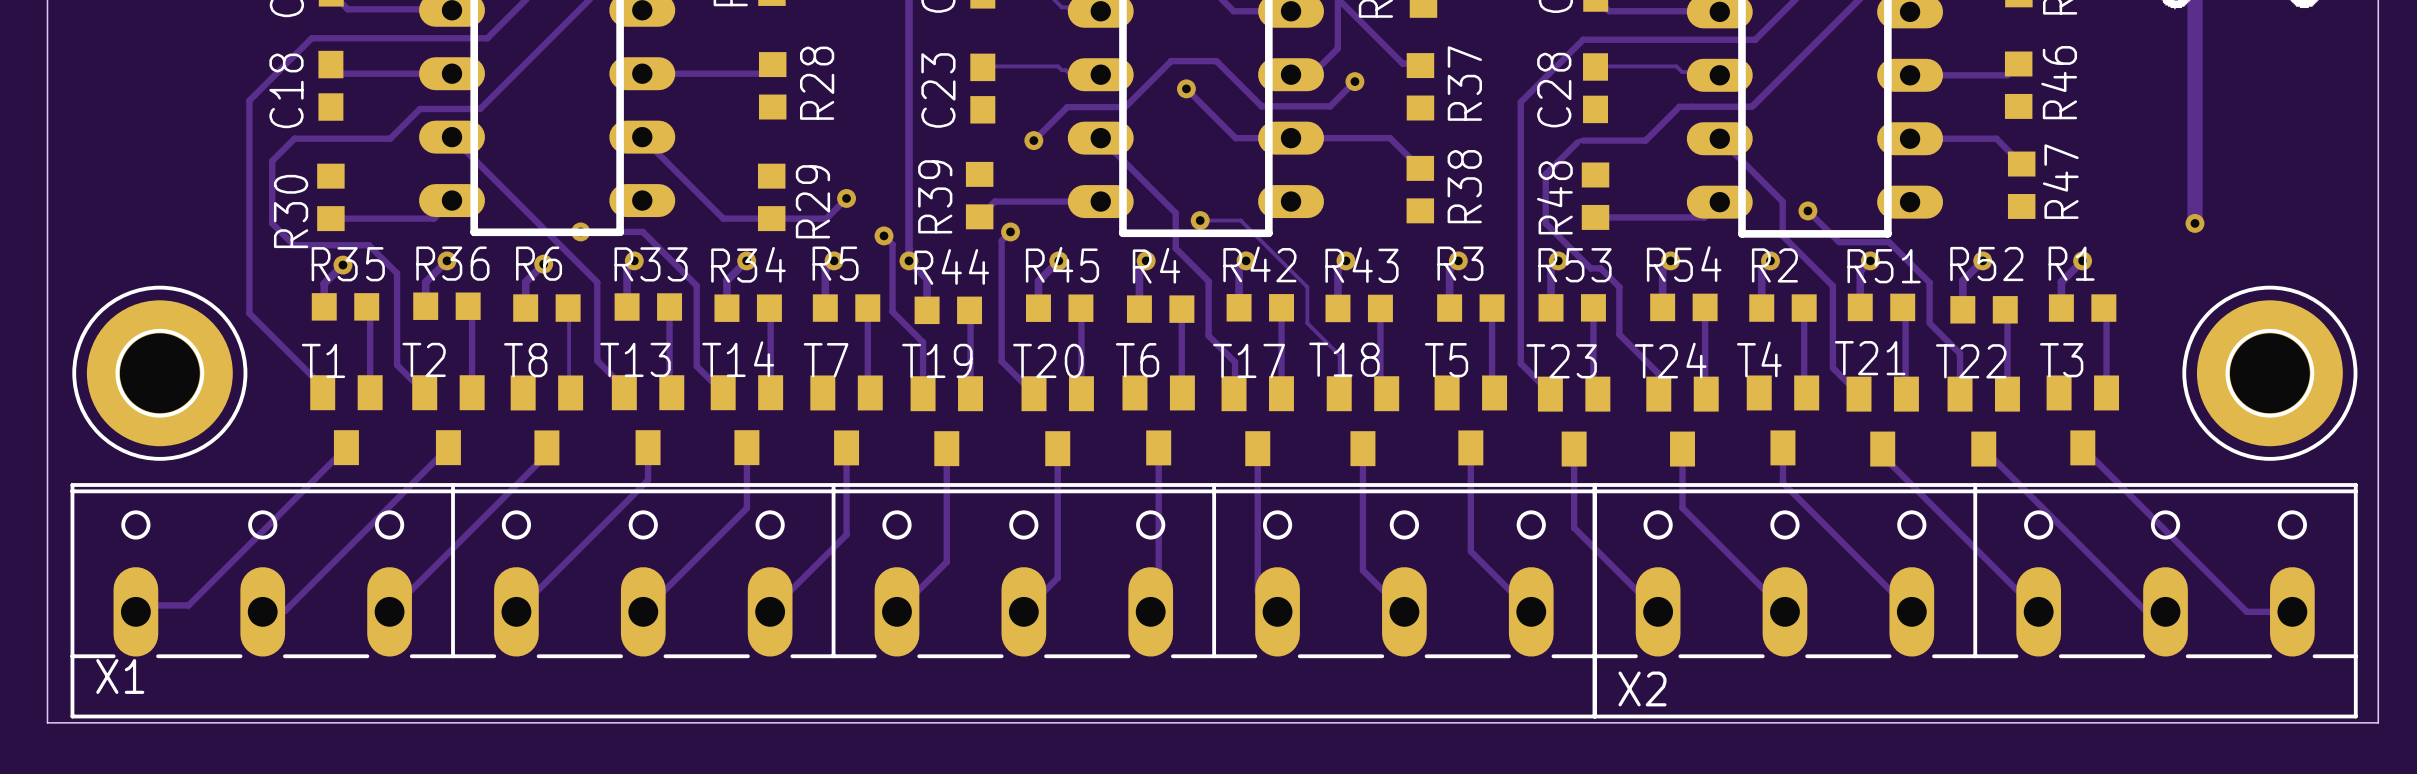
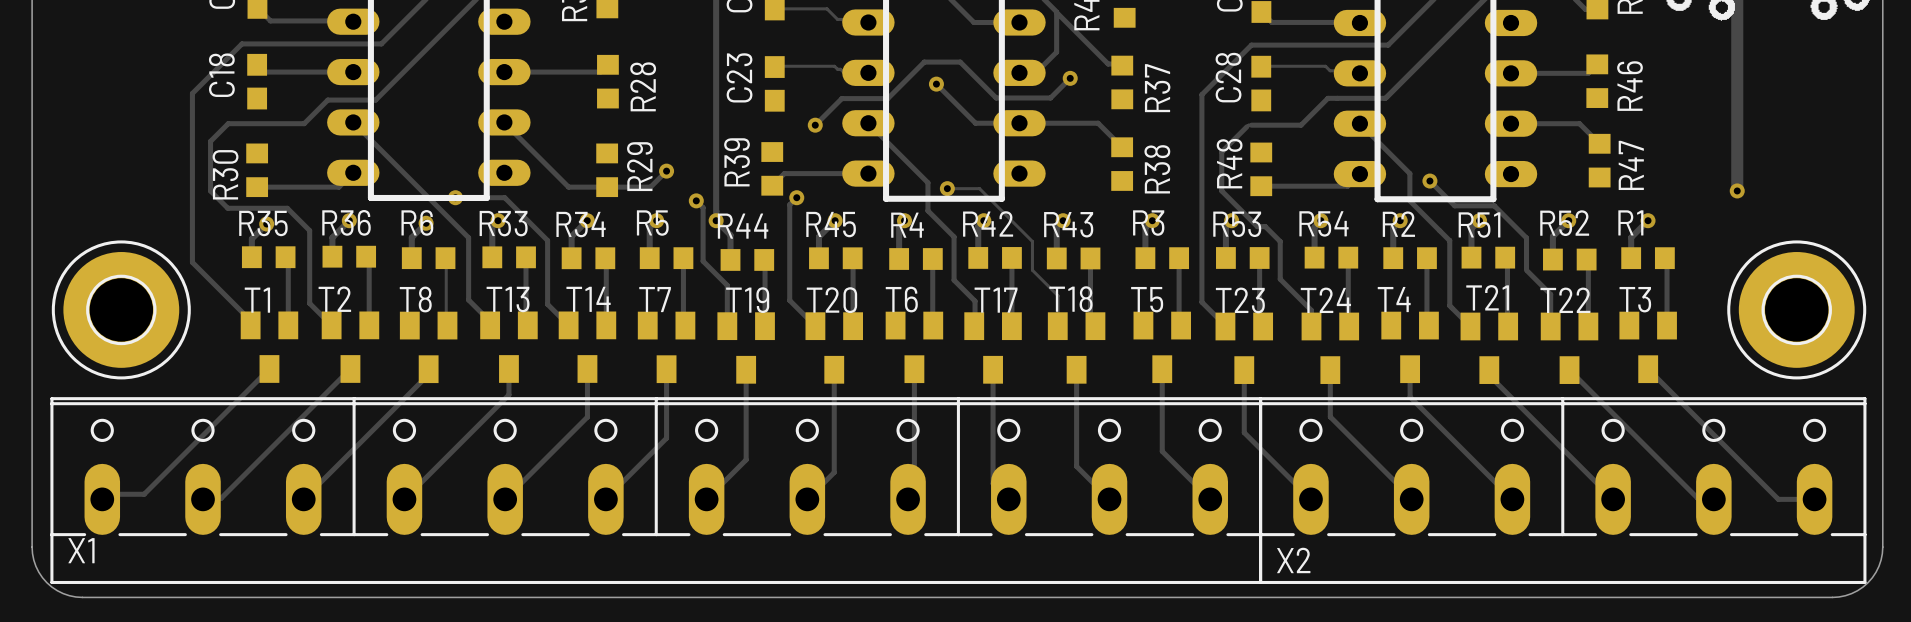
board edge: (47, 671) (47, 722) (2378, 722) (2378, 671) -> (32, 547) (35, 566) (46, 582) (63, 593) (82, 597) (1832, 597) (1851, 593) (1868, 582) (1878, 566) (1882, 547)

